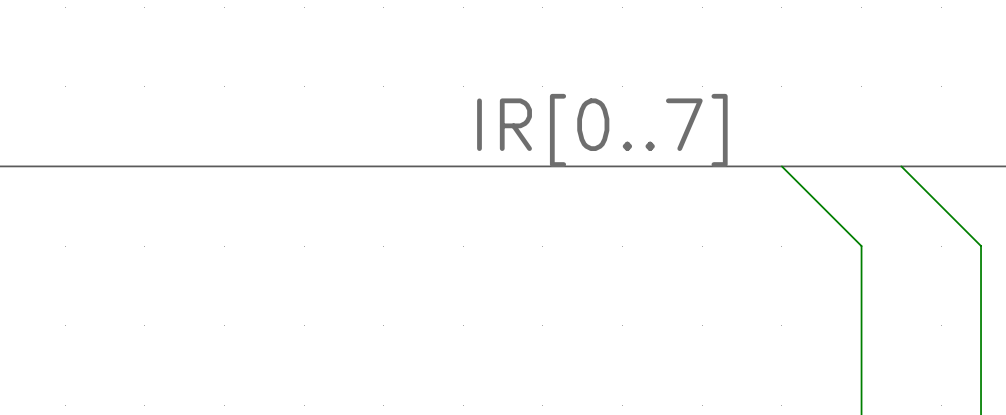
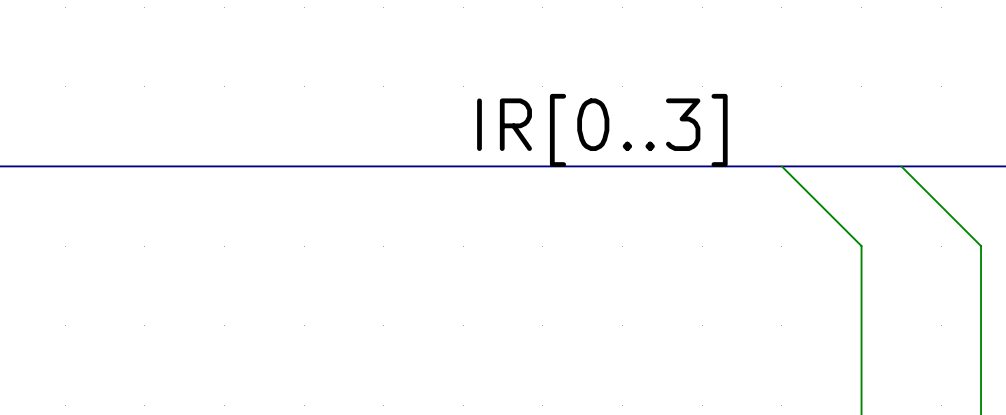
label: IR[0..7] (602, 130) -> IR[0..3] (602, 130)

